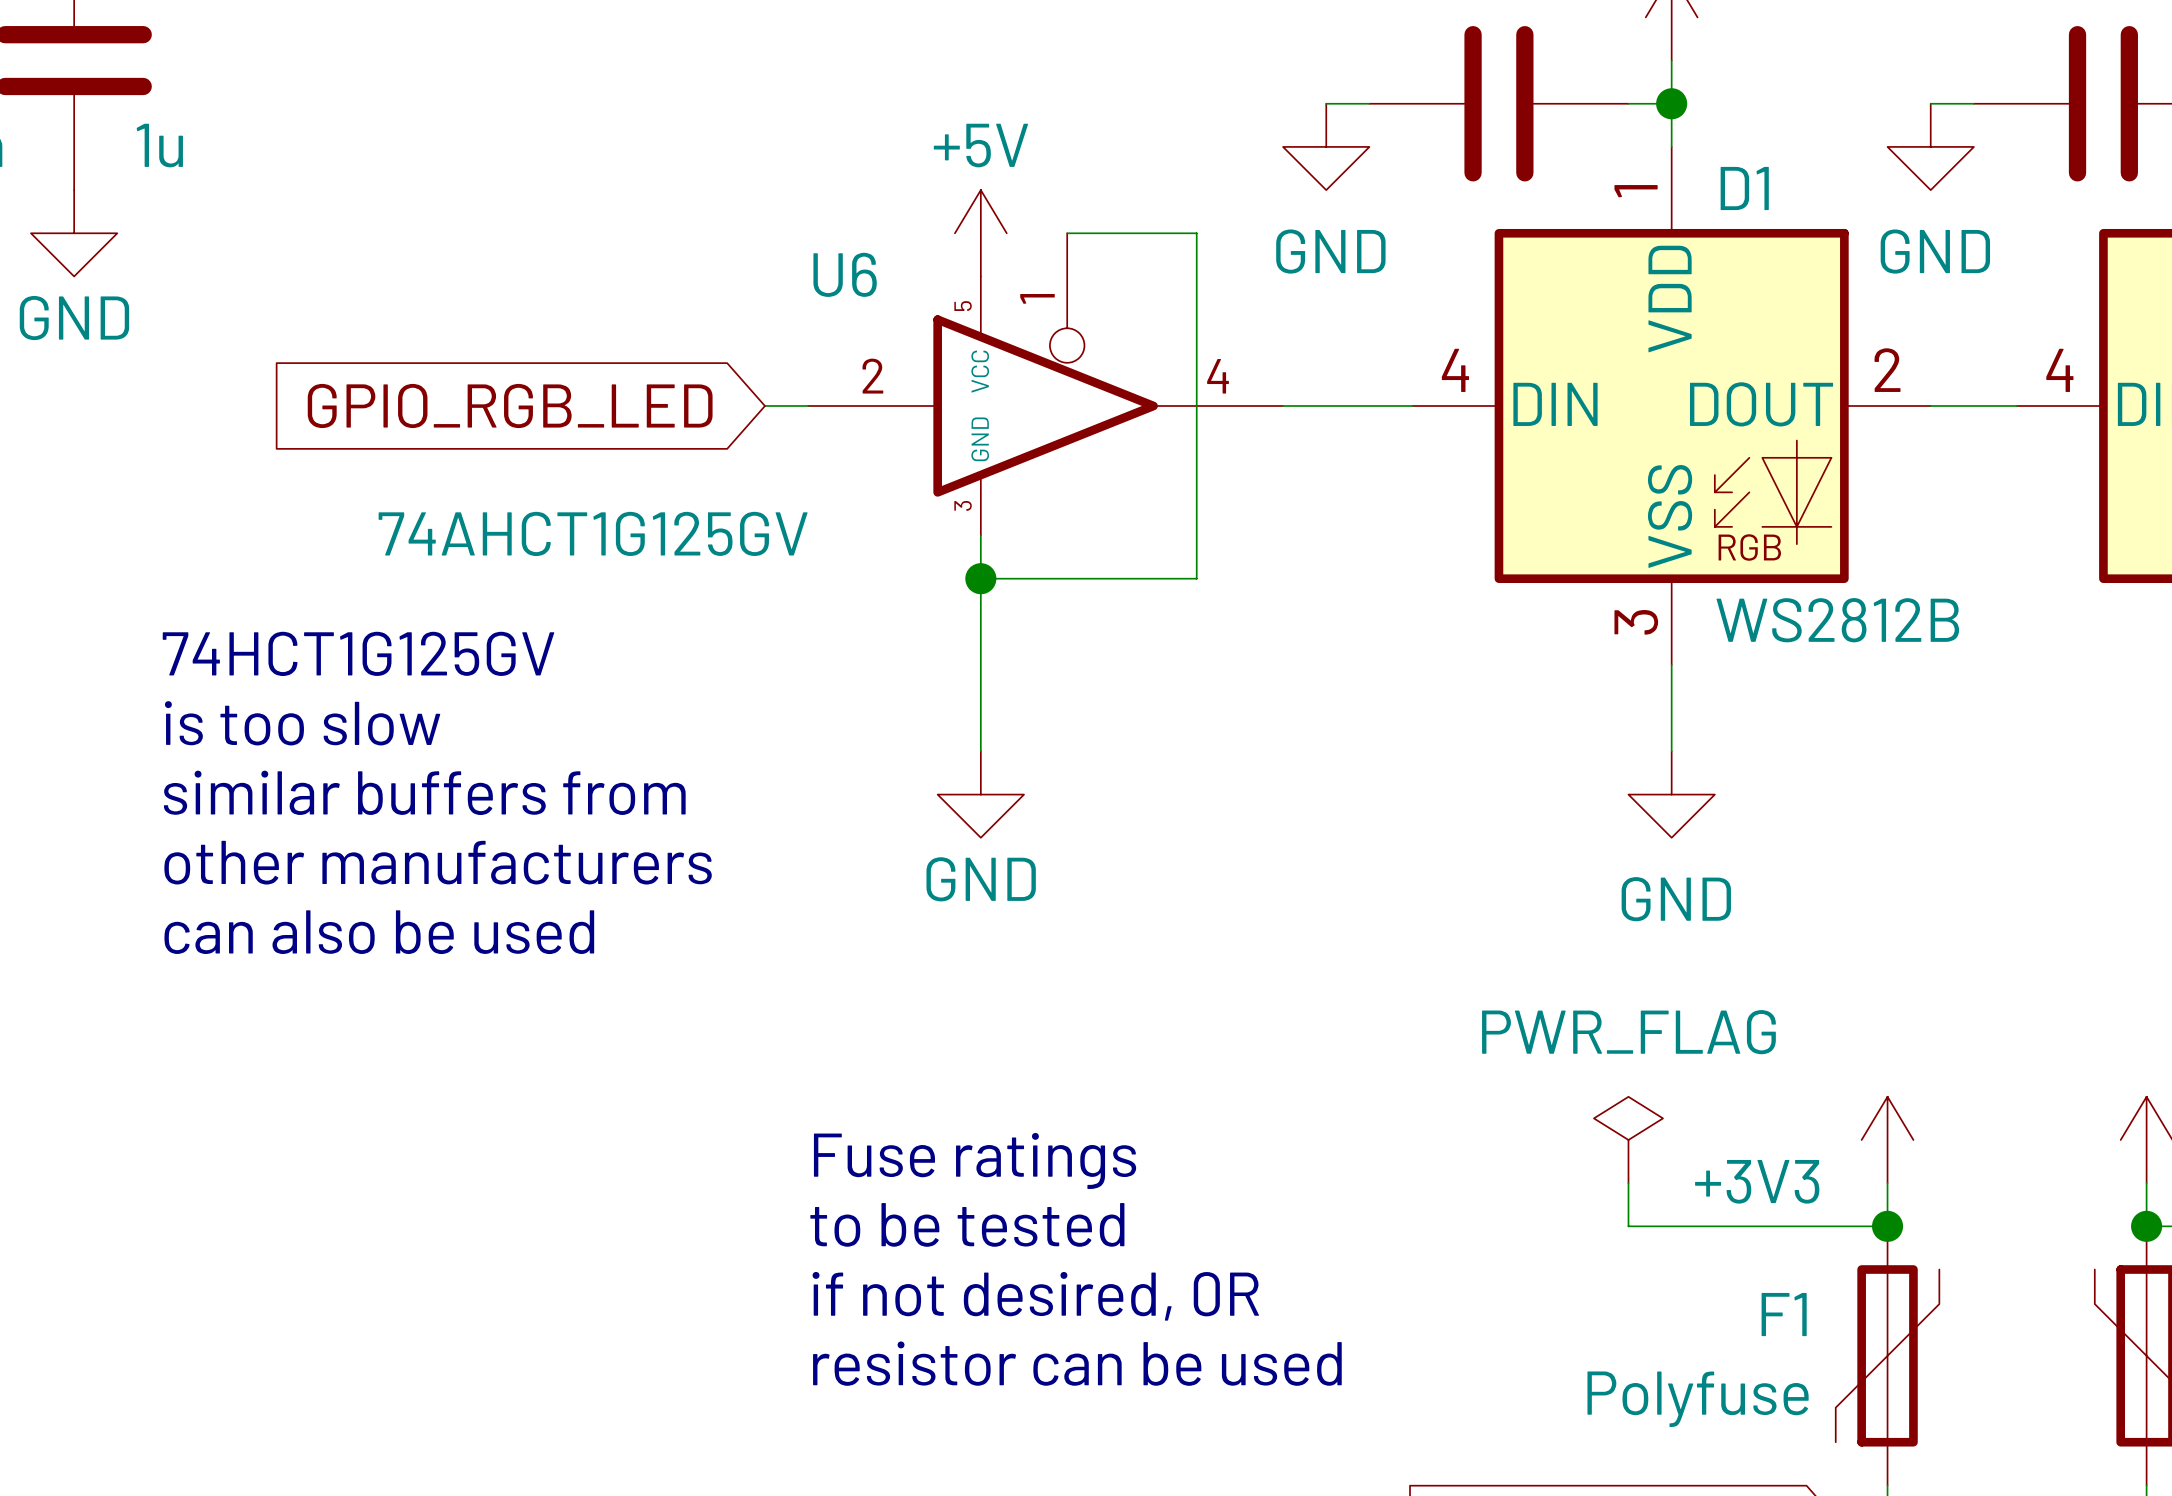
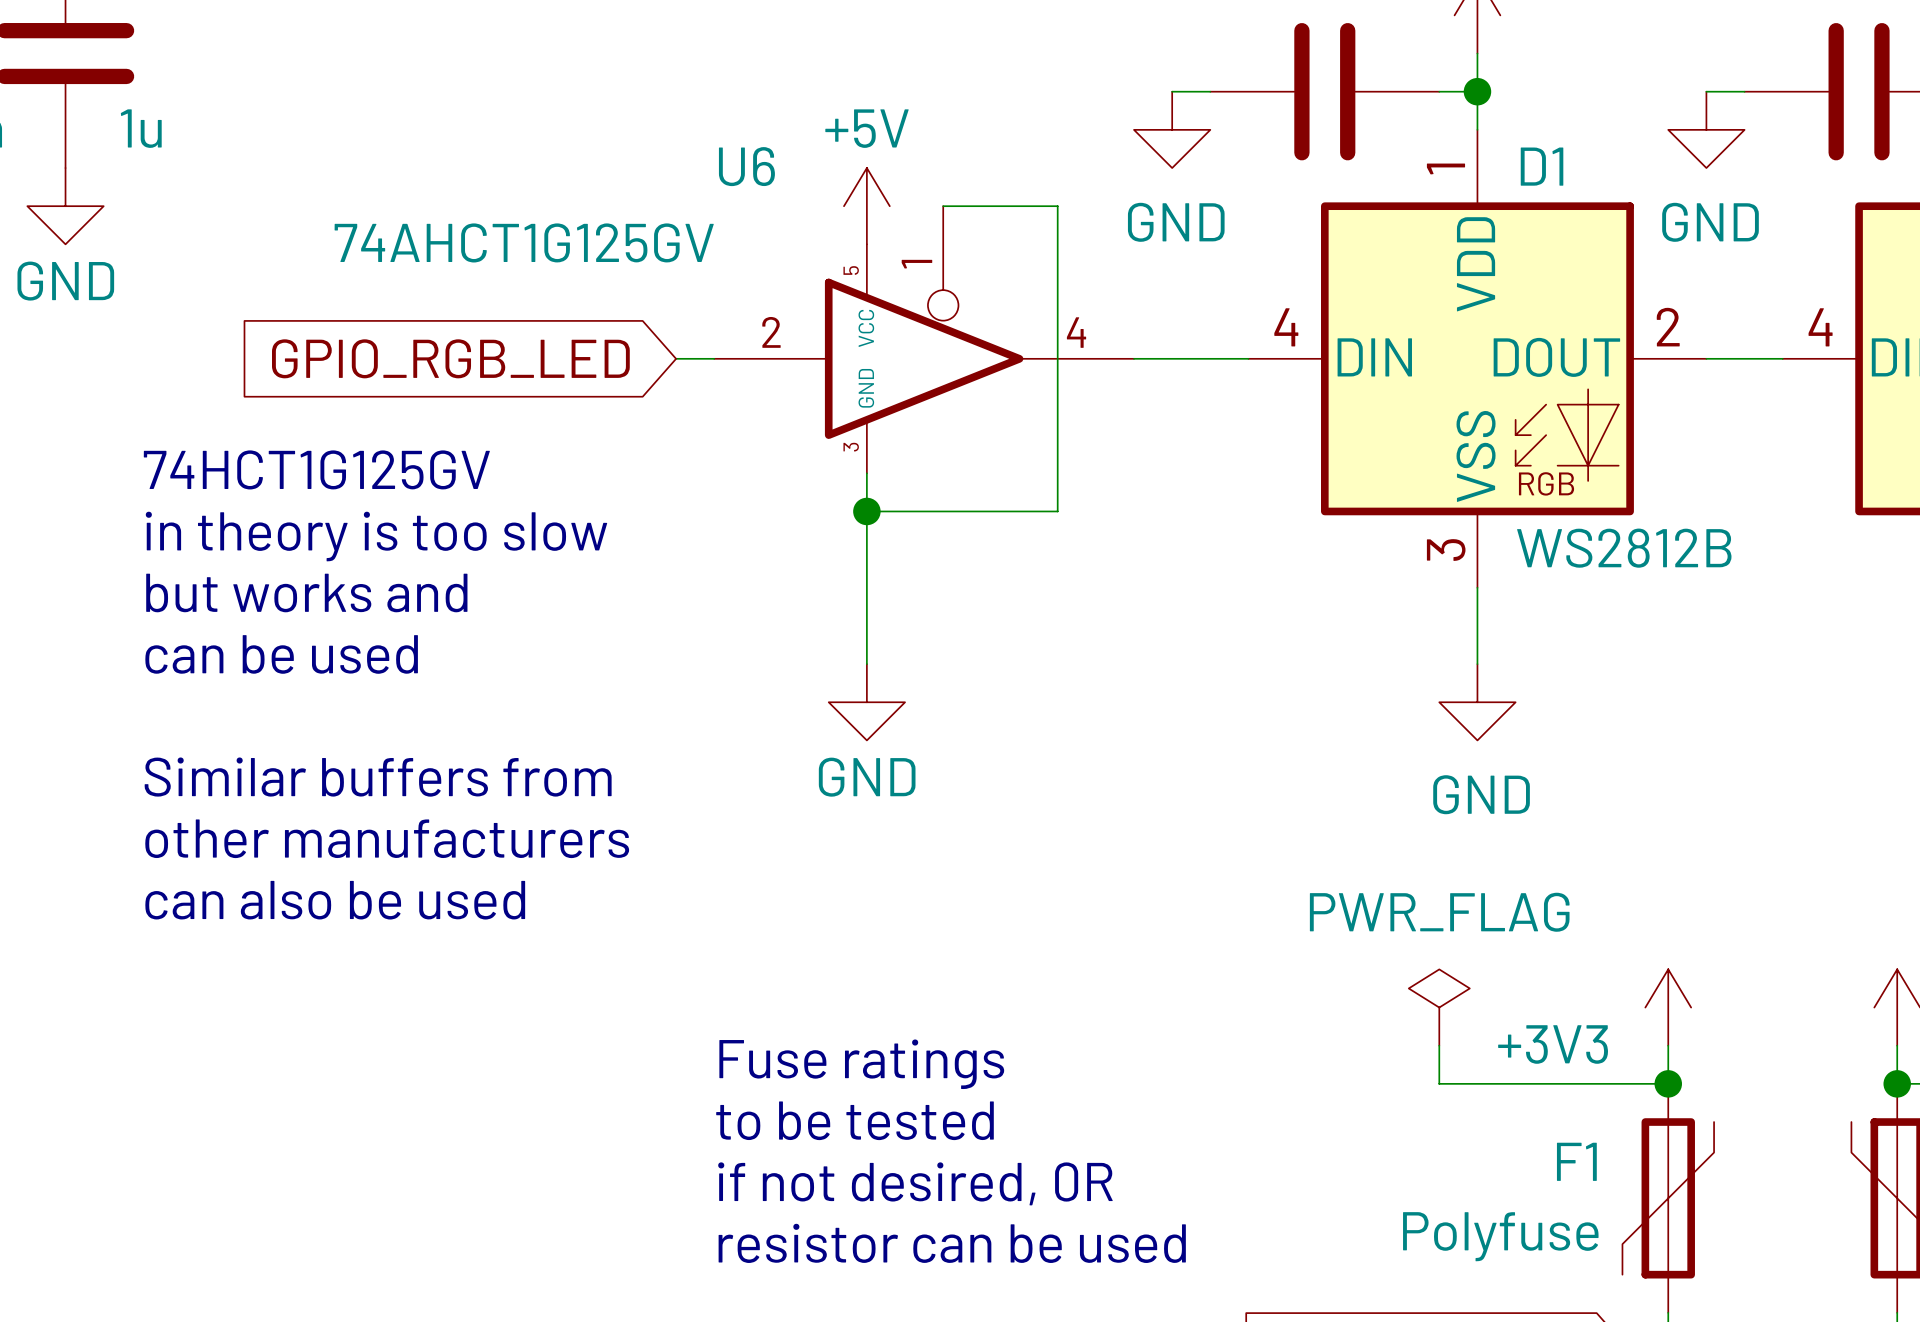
U6 name position: U6 (845, 274) -> U6 (746, 166)
U6 value position: 74AHCT1G125GV (593, 533) -> 74AHCT1G125GV (524, 242)
text: none -> in theory is too slow (376, 536)
text position: 74HCT1G125GV (358, 653) -> 74HCT1G125GV (316, 469)
text: none -> but works and (306, 592)
text: is too slow (302, 723) -> can be used (281, 654)
text: similar buffers from (424, 792) -> Similar buffers from (378, 777)
text position: other manufacturers (438, 862) -> other manufacturers (387, 838)
text position: can also be used (379, 932) -> can also be used (335, 900)
text position: Fuse ratings (975, 1160) -> Fuse ratings (861, 1064)
text position: to be tested (967, 1224) -> to be tested (855, 1120)
text position: if not desired, 0R (1035, 1296) -> if not desired, 0R (915, 1183)
text position: resistor can be used (1077, 1363) -> resistor can be used (952, 1243)

